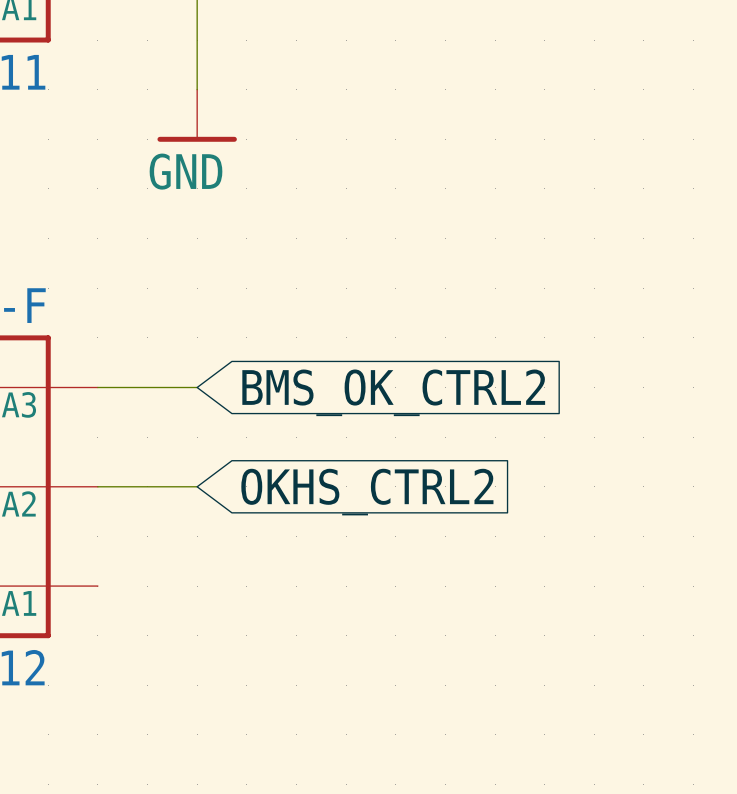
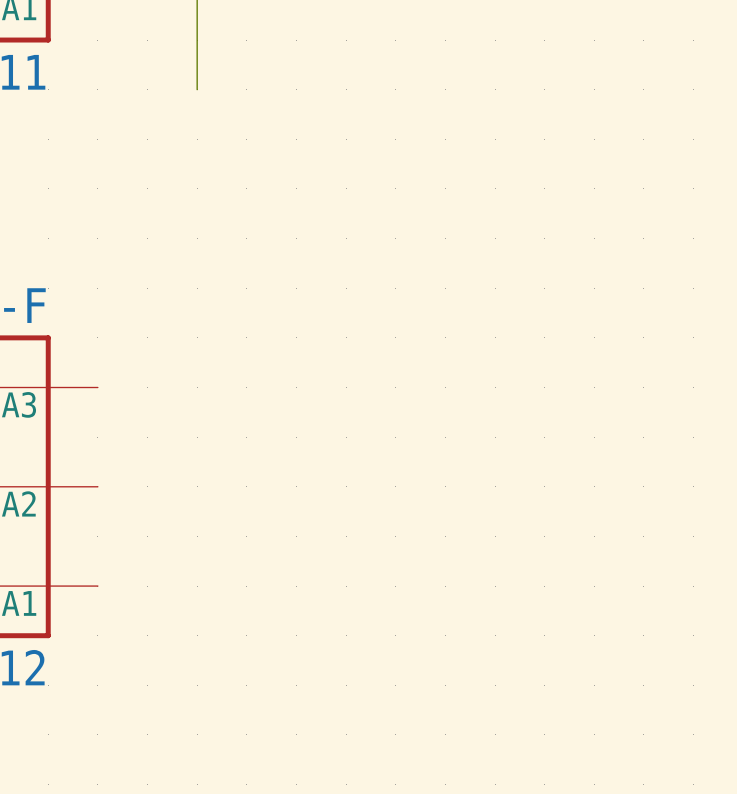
power symbol: GND (197, 115) -> none
wire: (97, 387) (197, 387) -> none
global label: BMS_OK_CTRL2 (393, 392) -> none
wire: (97, 486) (197, 486) -> none
global label: OKHS_CTRL2 (367, 492) -> none

